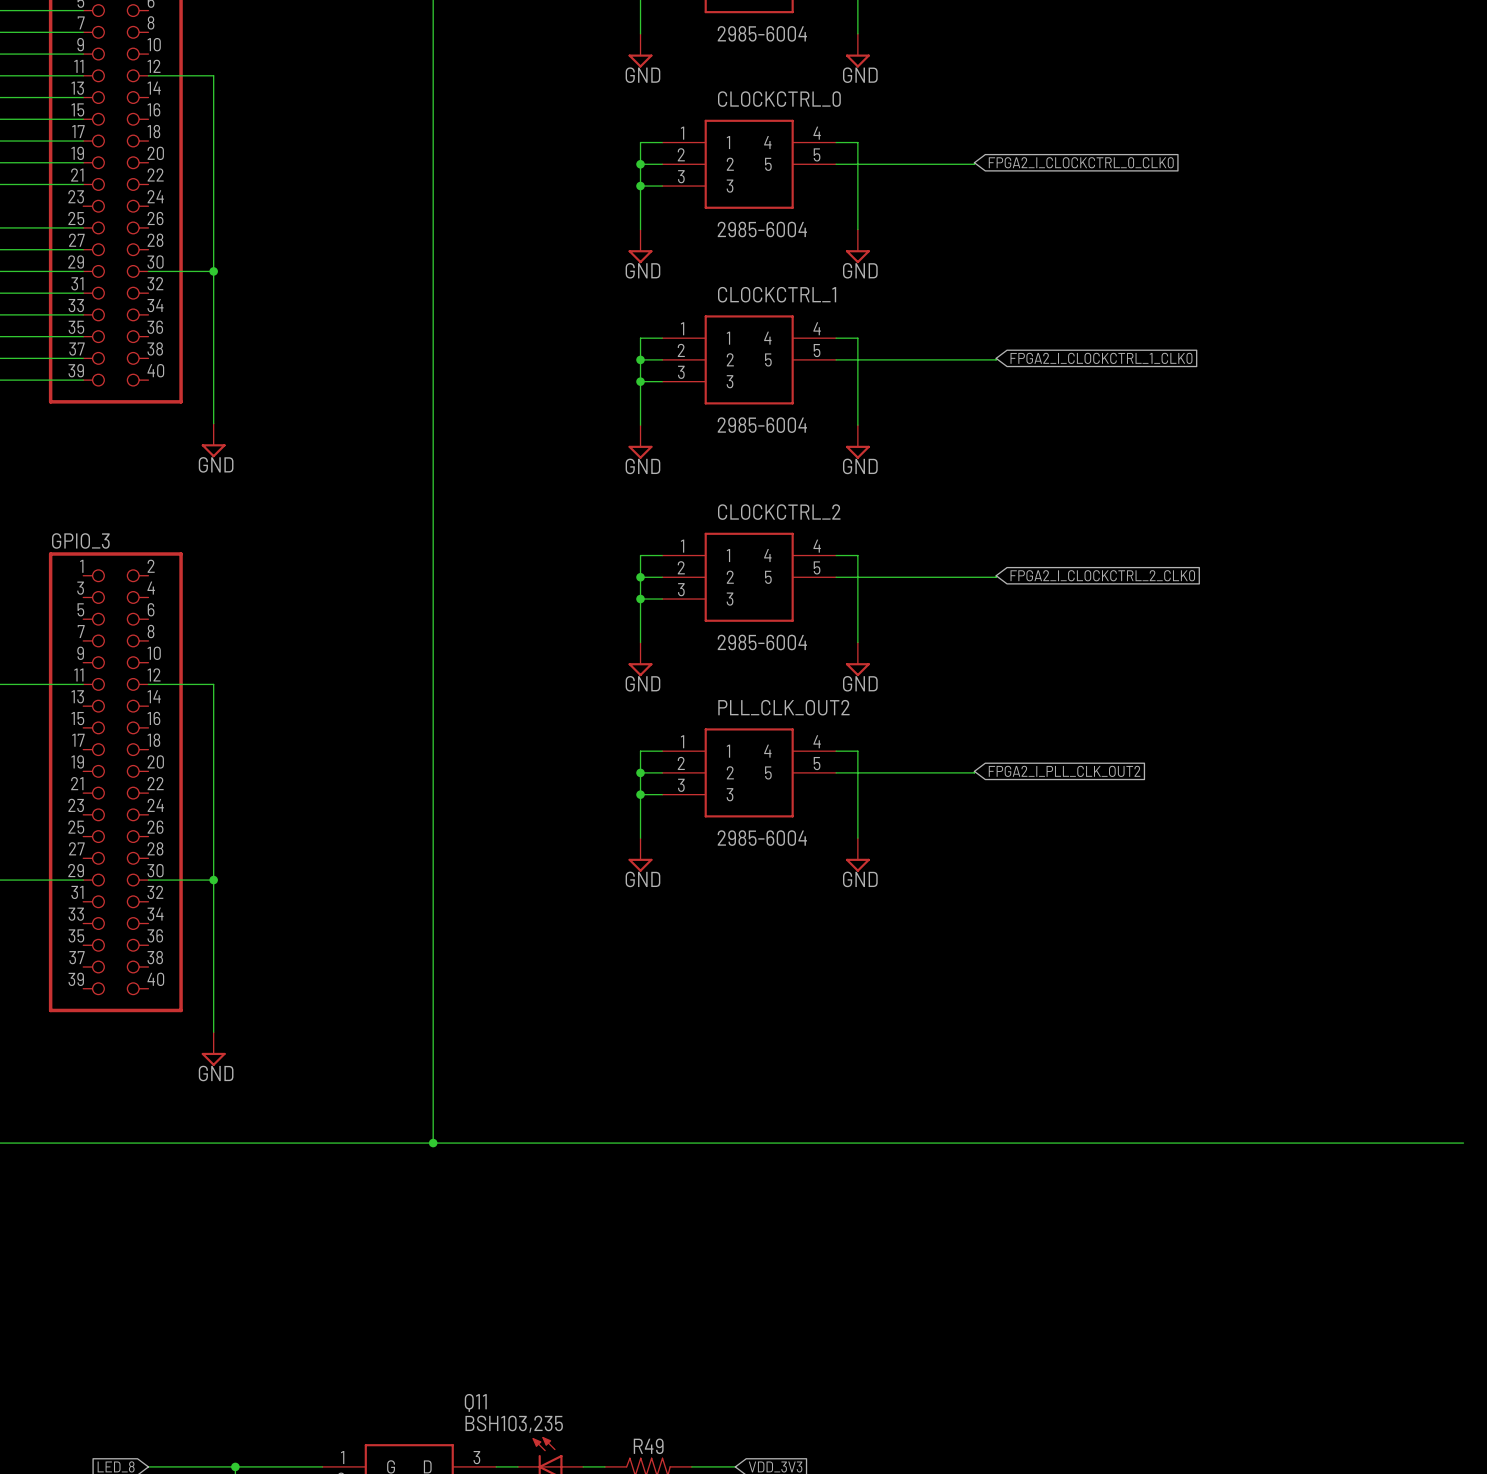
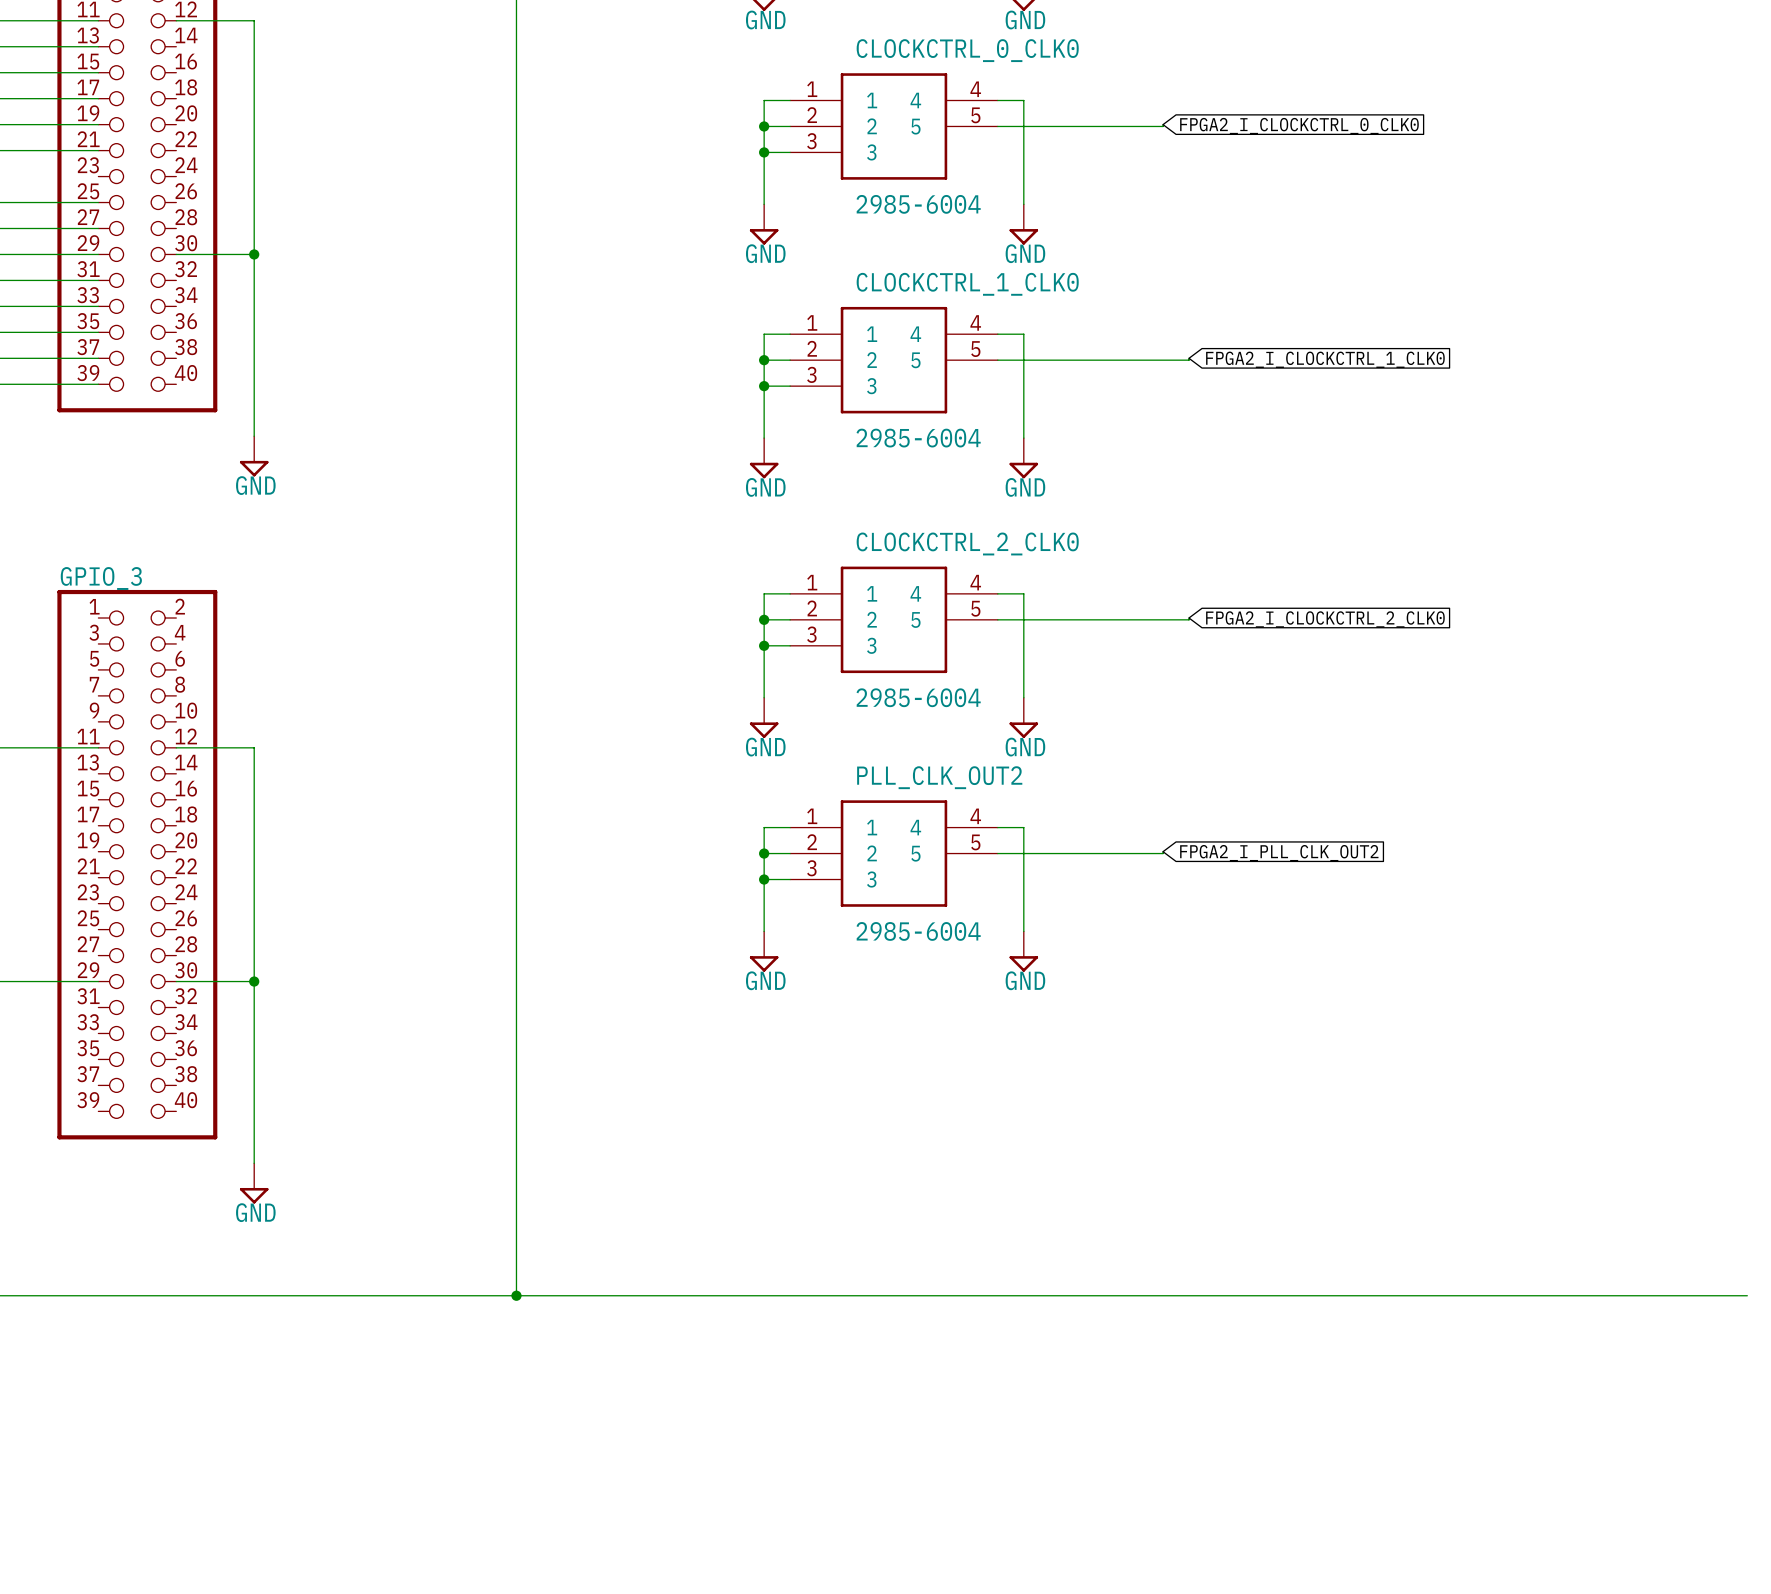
CLOCKCTRL_0 name: CLOCKCTRL_0 (779, 99) -> CLOCKCTRL_0_CLK0 (967, 50)
CLOCKCTRL_1 name: CLOCKCTRL_1 (777, 294) -> CLOCKCTRL_1_CLK0 (967, 284)
CLOCKCTRL_2 name: CLOCKCTRL_2 (779, 512) -> CLOCKCTRL_2_CLK0 (967, 543)

